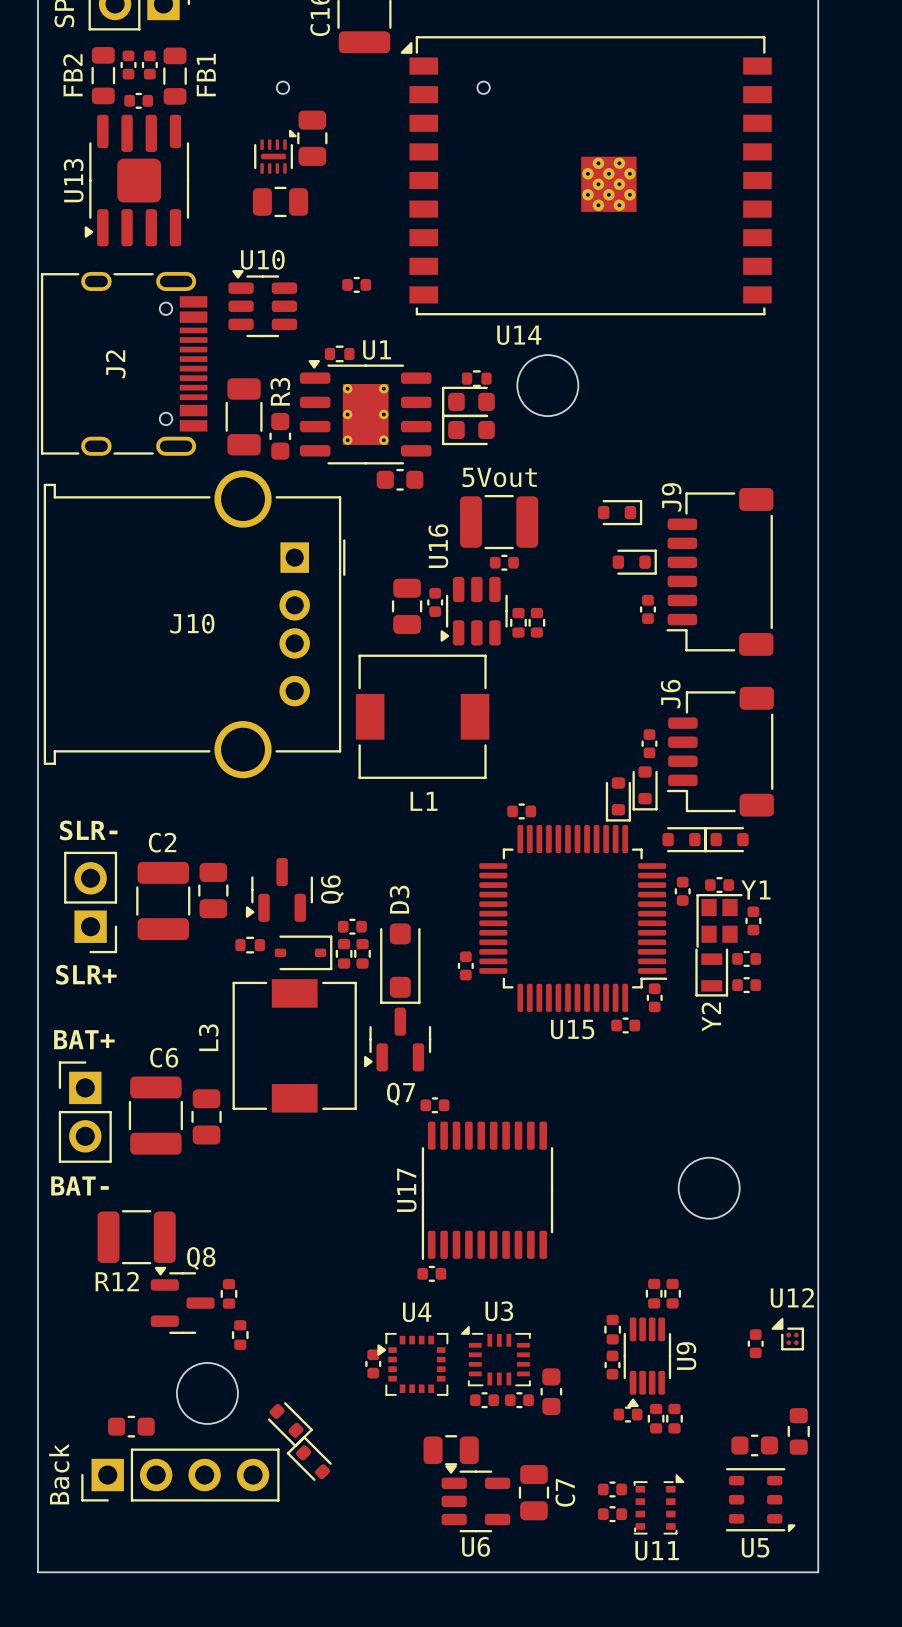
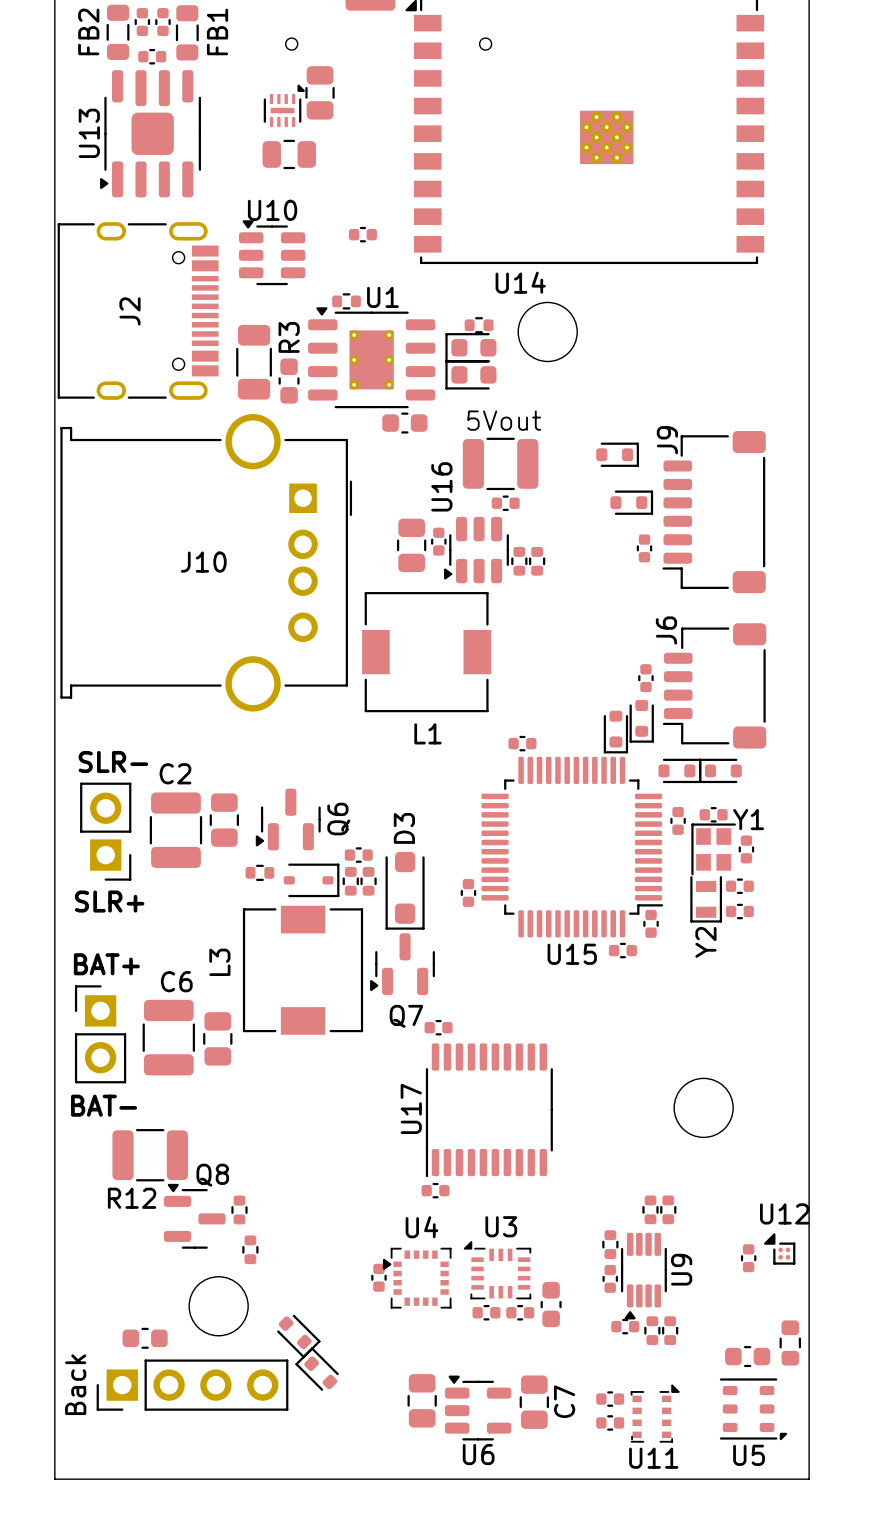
part rotation: 0° (451, 1450) -> 90° clockwise (422, 1400)
part position: (451, 1450) -> (422, 1400)

